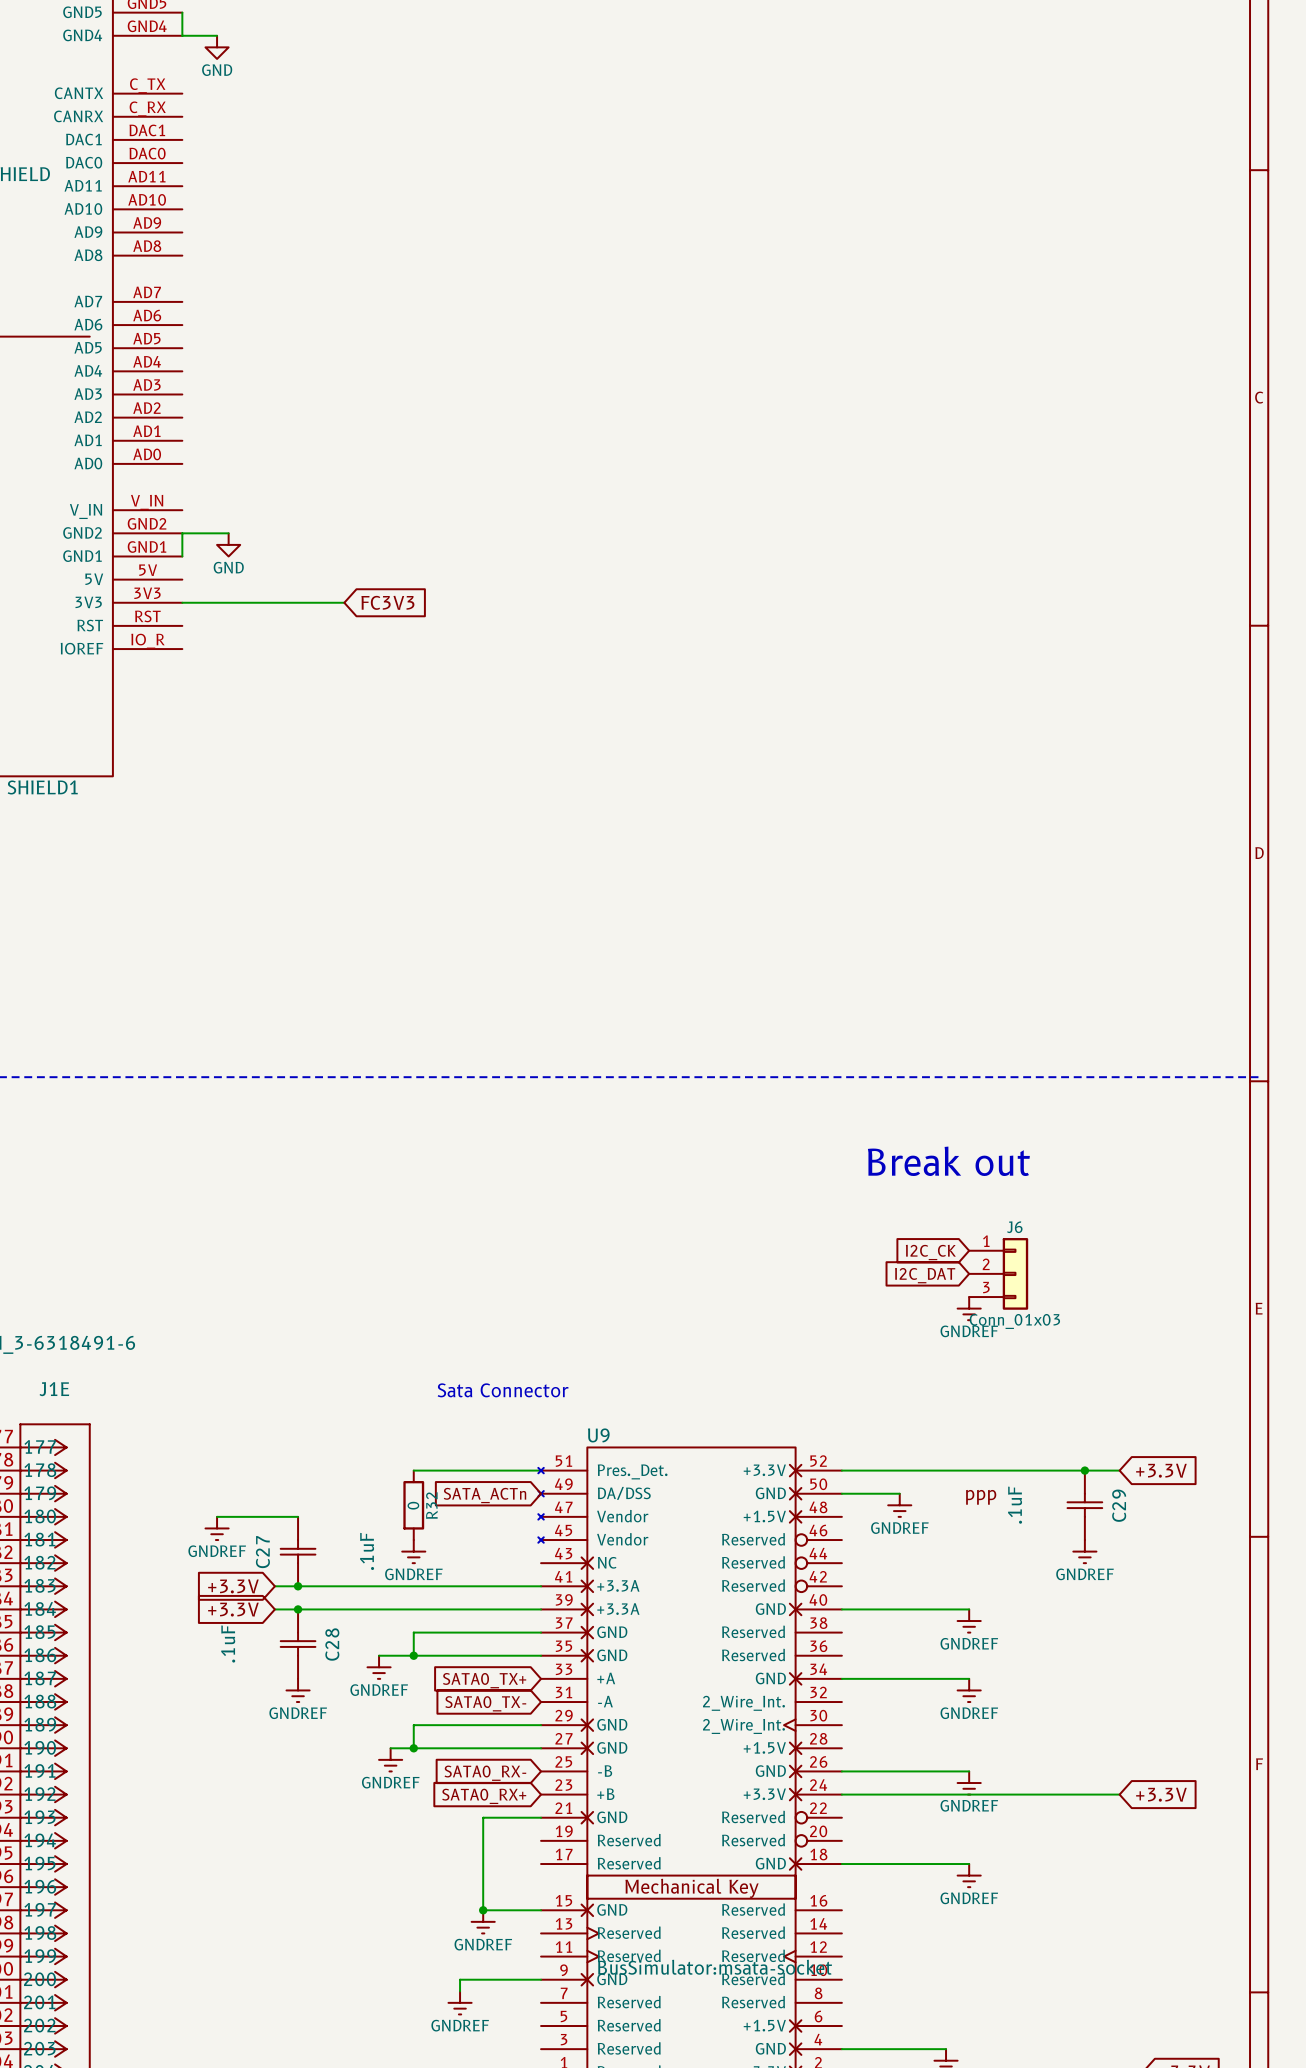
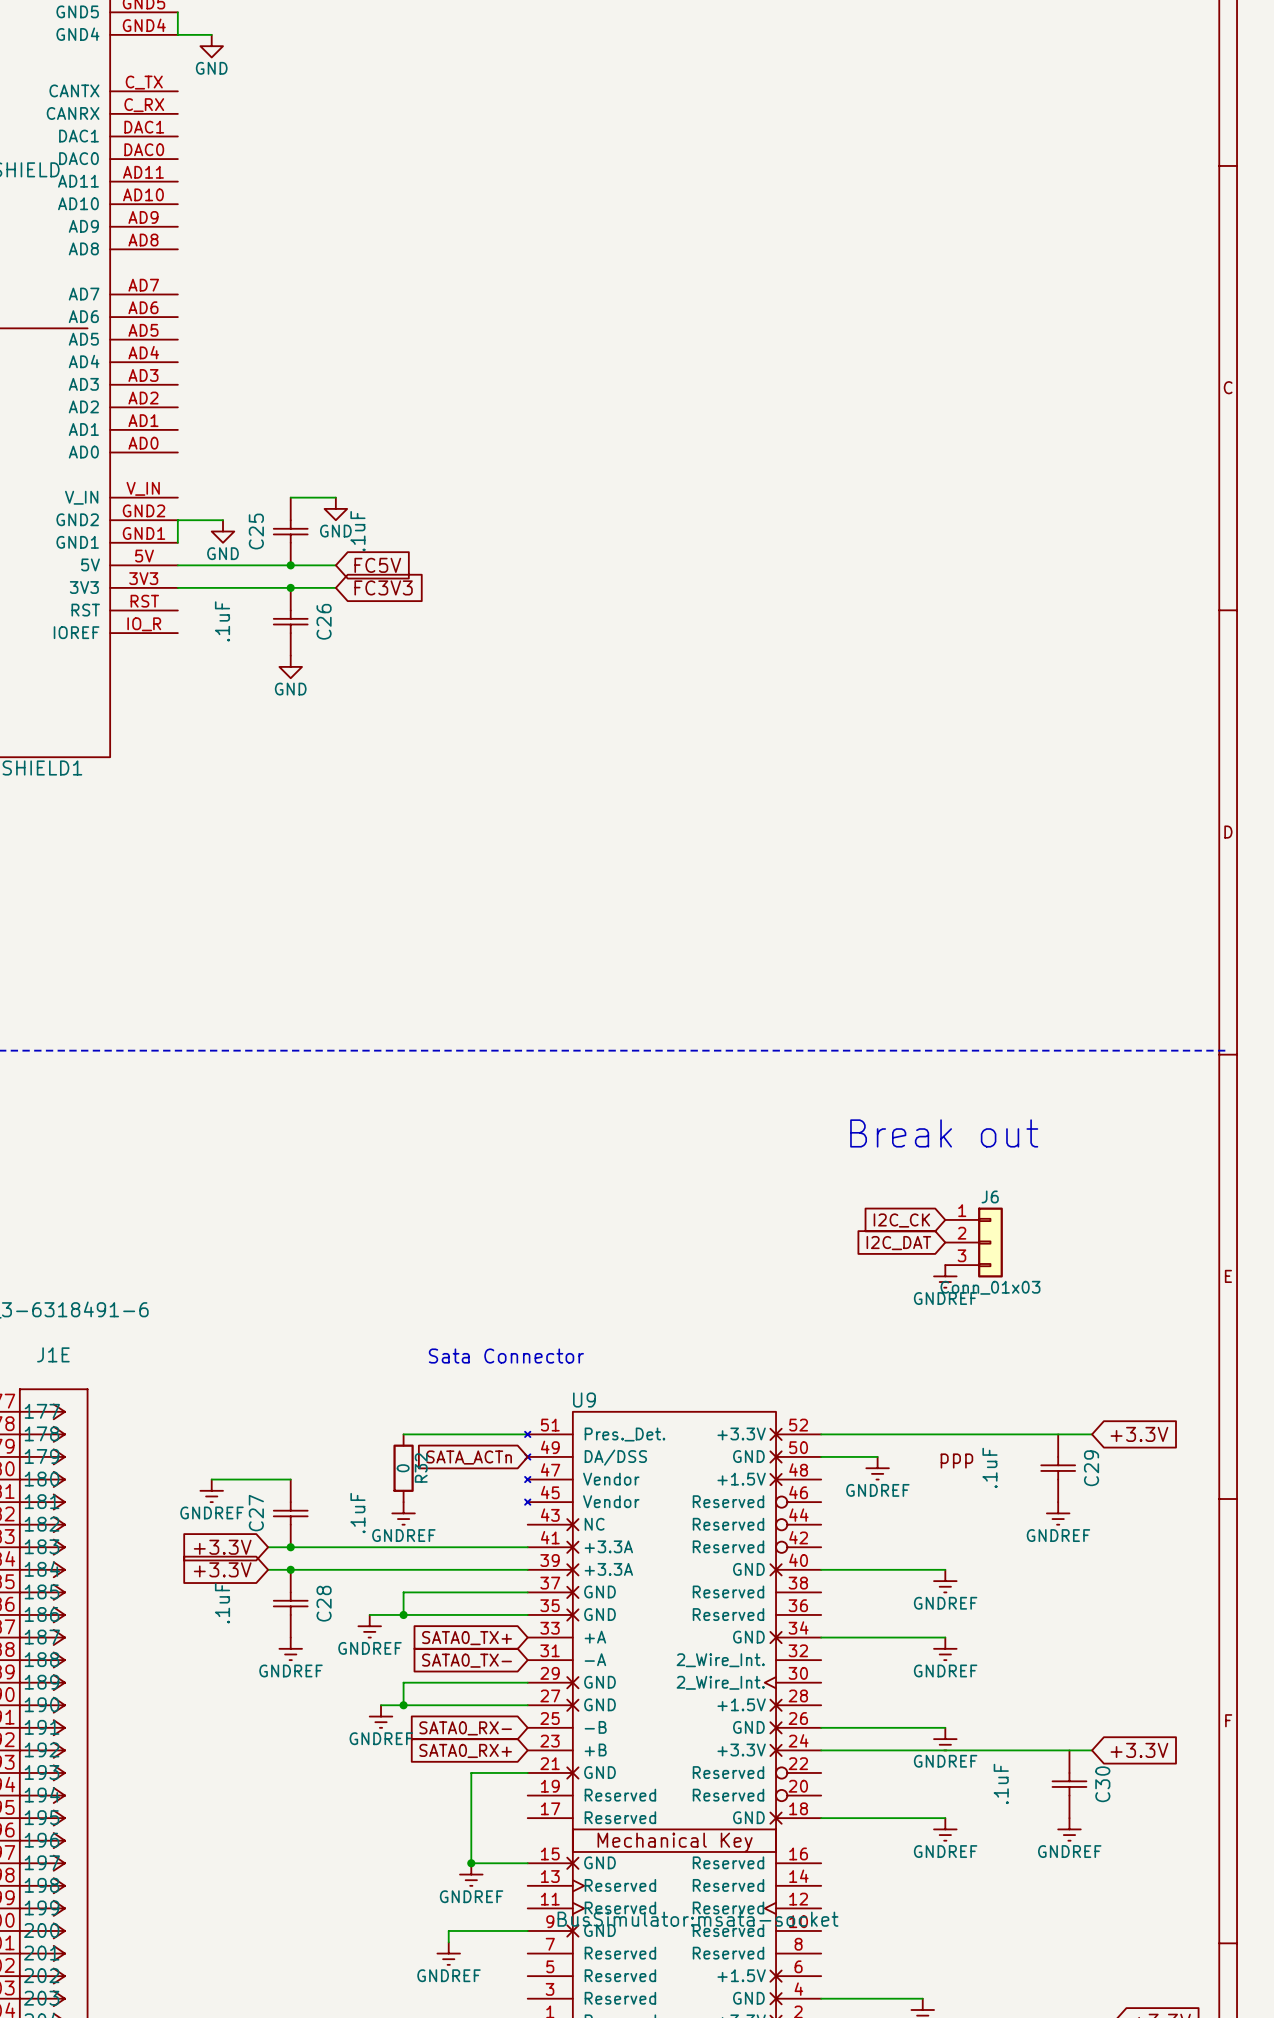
wire: none -> (290, 497) (335, 497)
power symbol: none -> GND (335, 508)
C25: none -> .1uF (290, 531)
wire: none -> (177, 565) (335, 565)
junction: none -> (290, 565)
global label: none -> FC5V (377, 565)
junction: none -> (290, 587)
C26: none -> .1uF (290, 621)
power symbol: none -> GND (290, 666)
junction: (1084, 1470) -> none
C30: none -> .1uF (1069, 1784)
power symbol: none -> GNDREF (1069, 1829)

